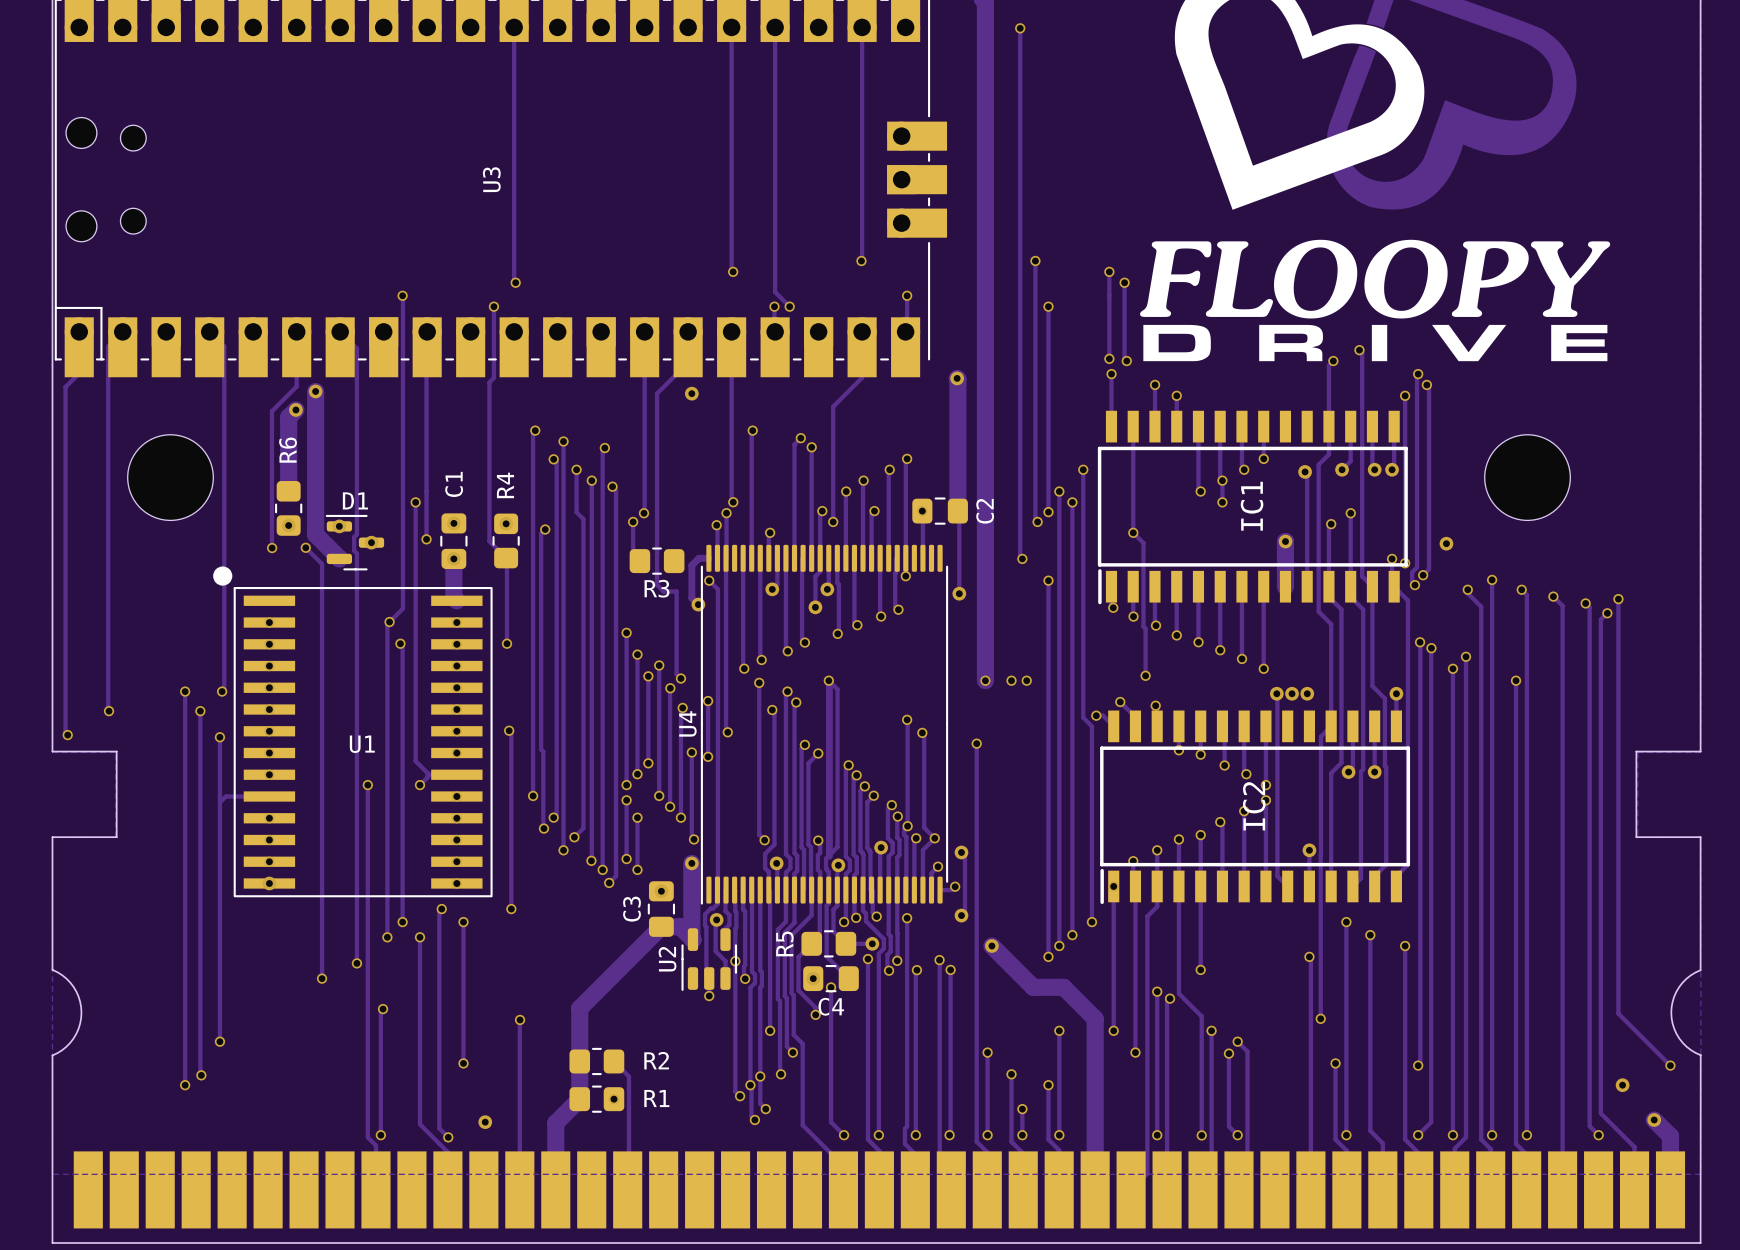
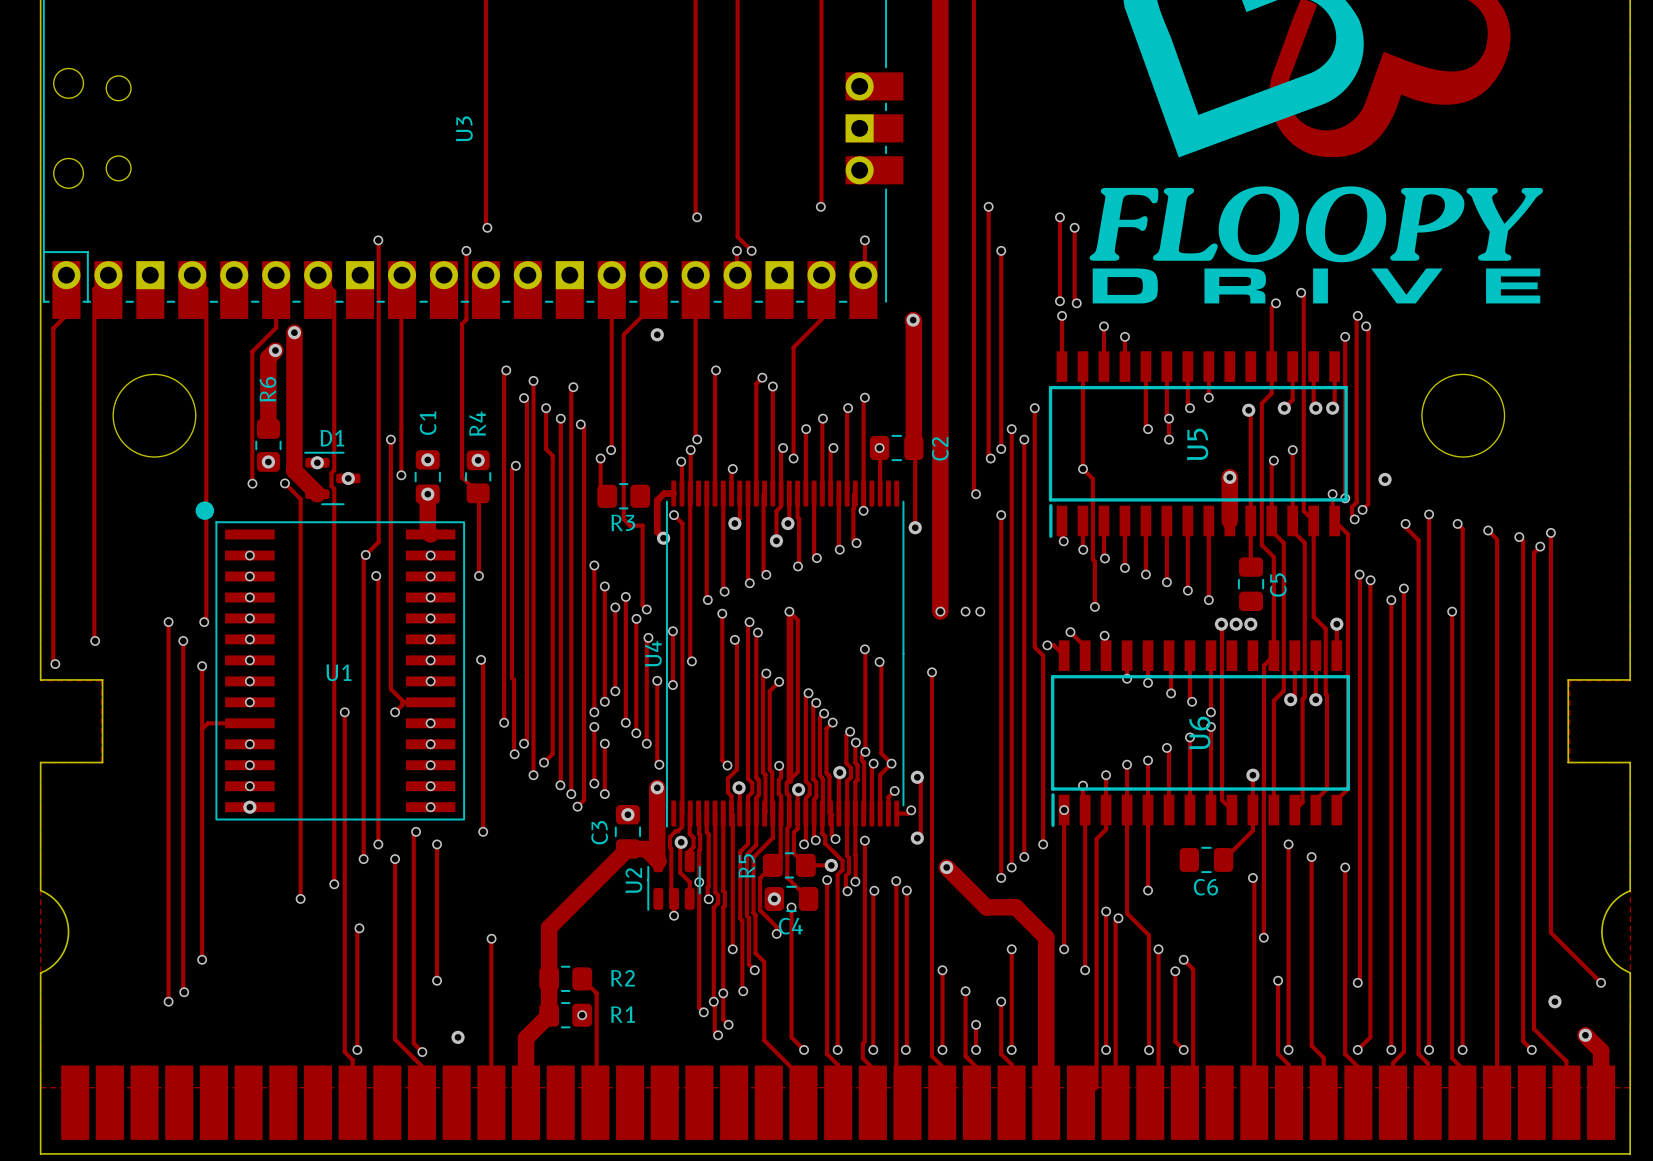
IC1 name: IC1 (1252, 506) -> U5 (1197, 444)
track: none -> (1250, 520) (1251, 567)
C5: none -> (1251, 584)
IC2 name: IC2 (1254, 806) -> U6 (1199, 733)
track: none -> (1252, 810) (1252, 830) (1223, 859)
C6: none -> (1206, 859)

